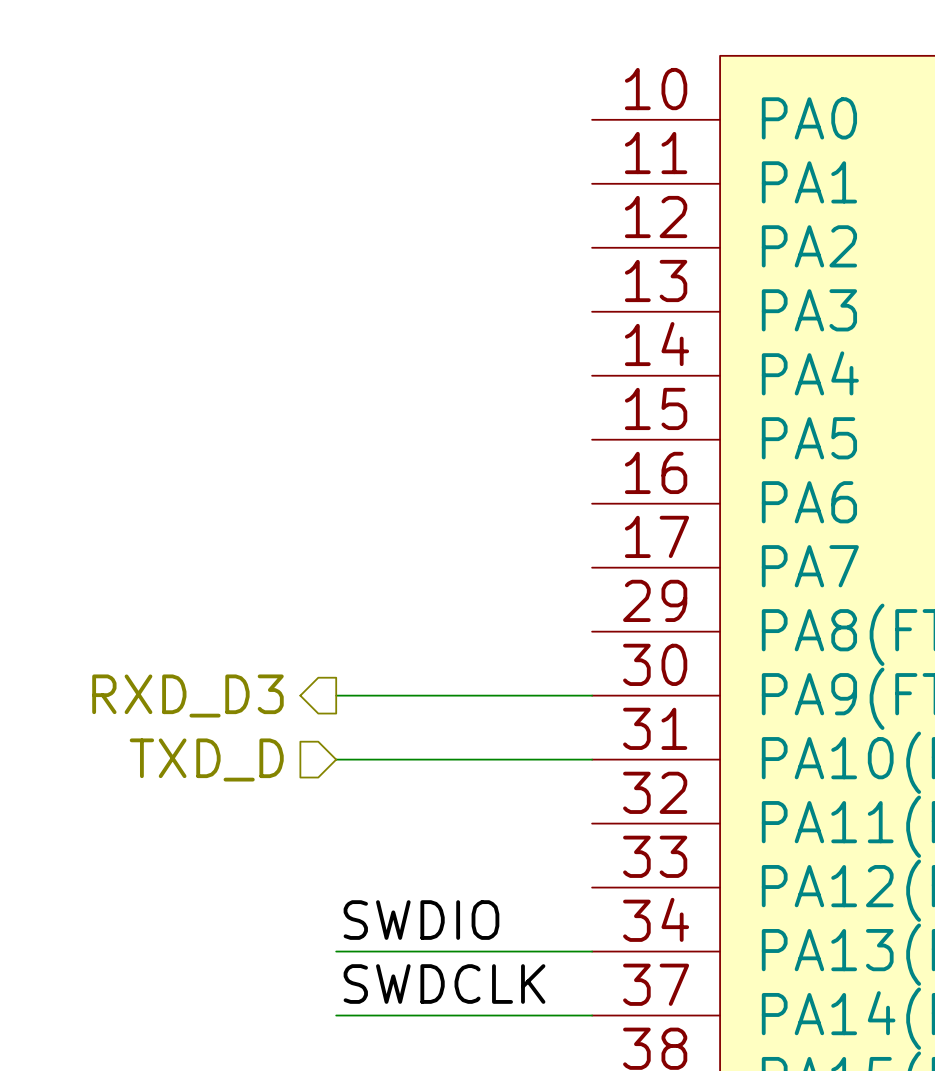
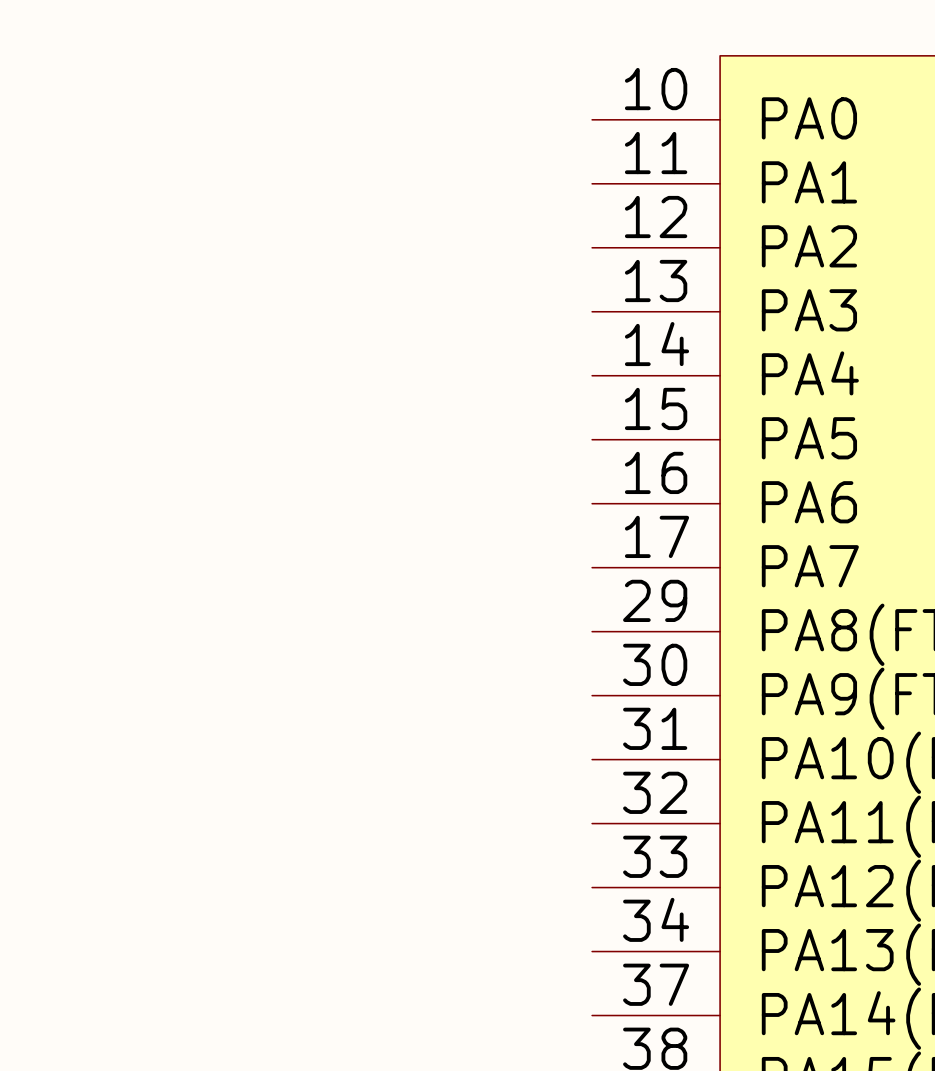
wire: (336, 695) (592, 695) -> none
hierarchical label: RXD_D3 (187, 696) -> none
hierarchical label: TXD_D (206, 759) -> none
wire: (336, 759) (592, 759) -> none
label: SWDIO (421, 920) -> none
wire: (336, 951) (592, 951) -> none
label: SWDCLK (444, 984) -> none
wire: (336, 1015) (592, 1015) -> none

